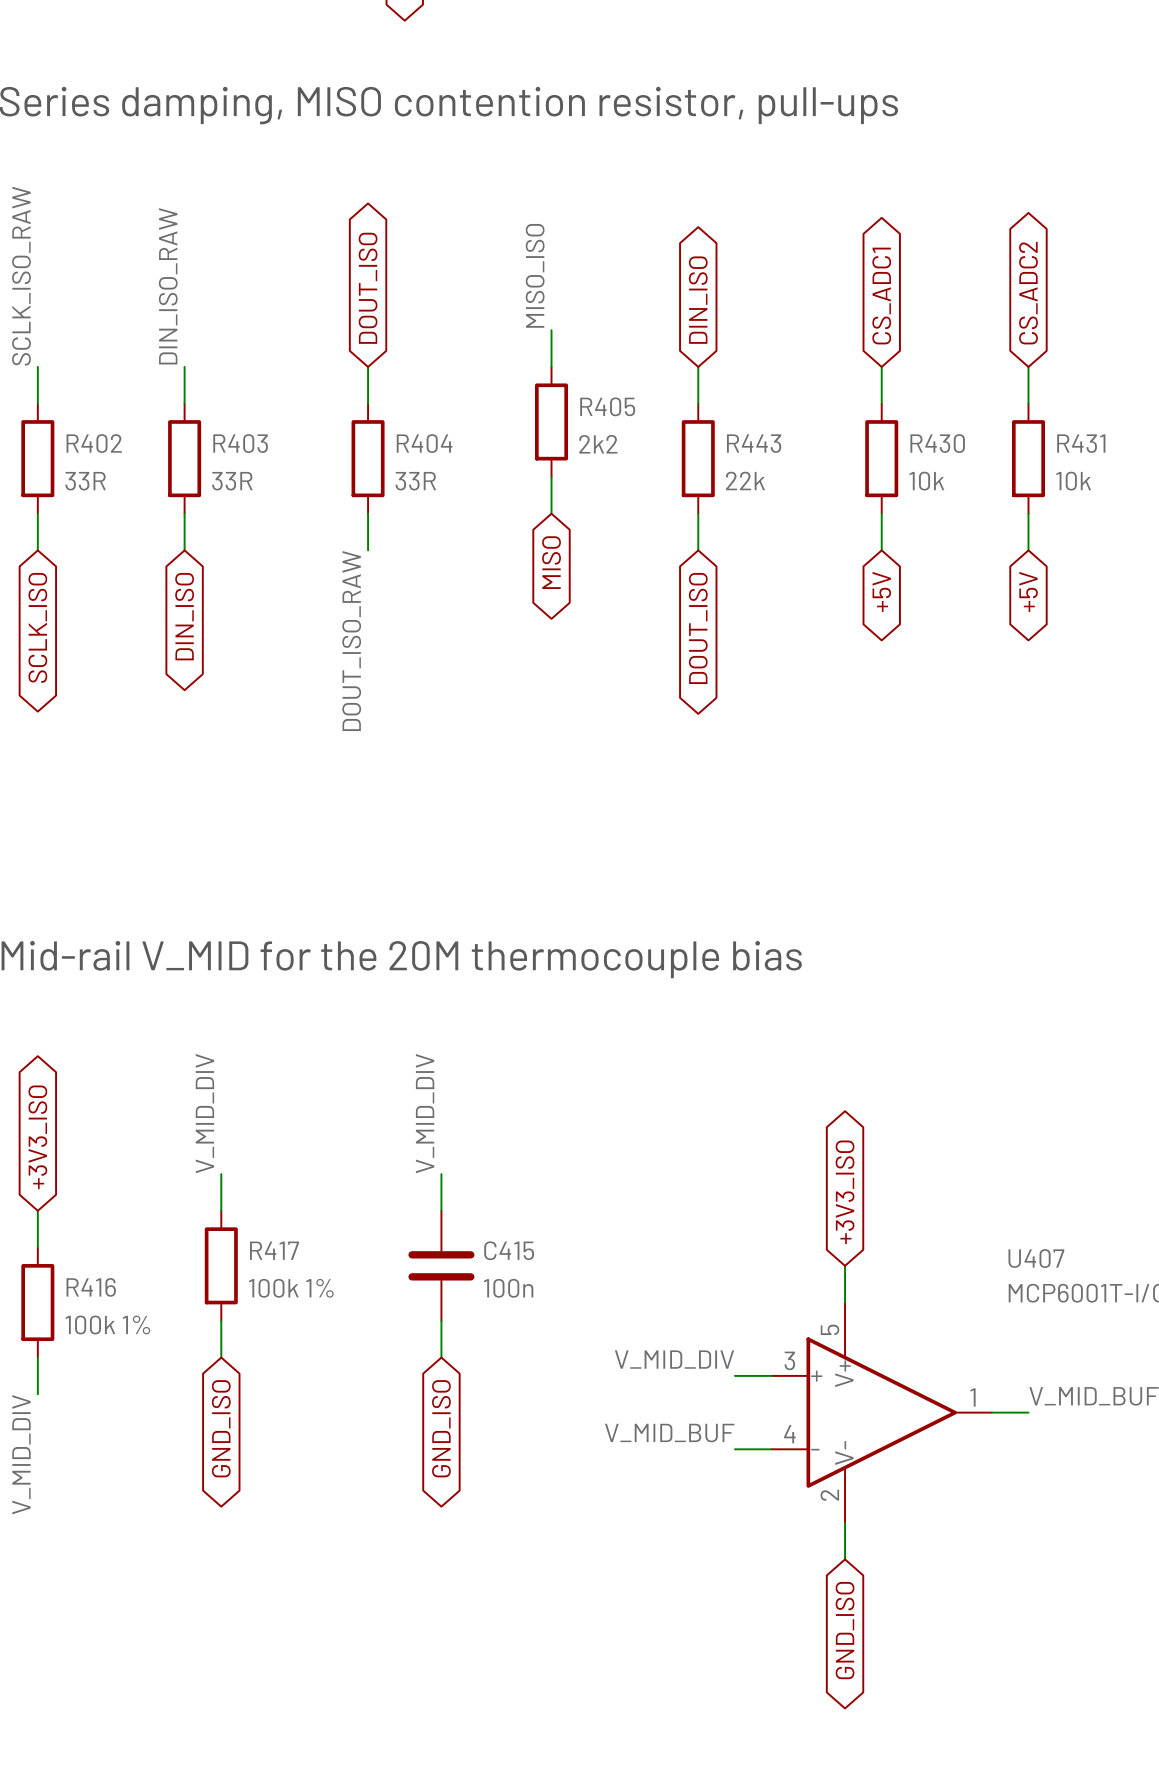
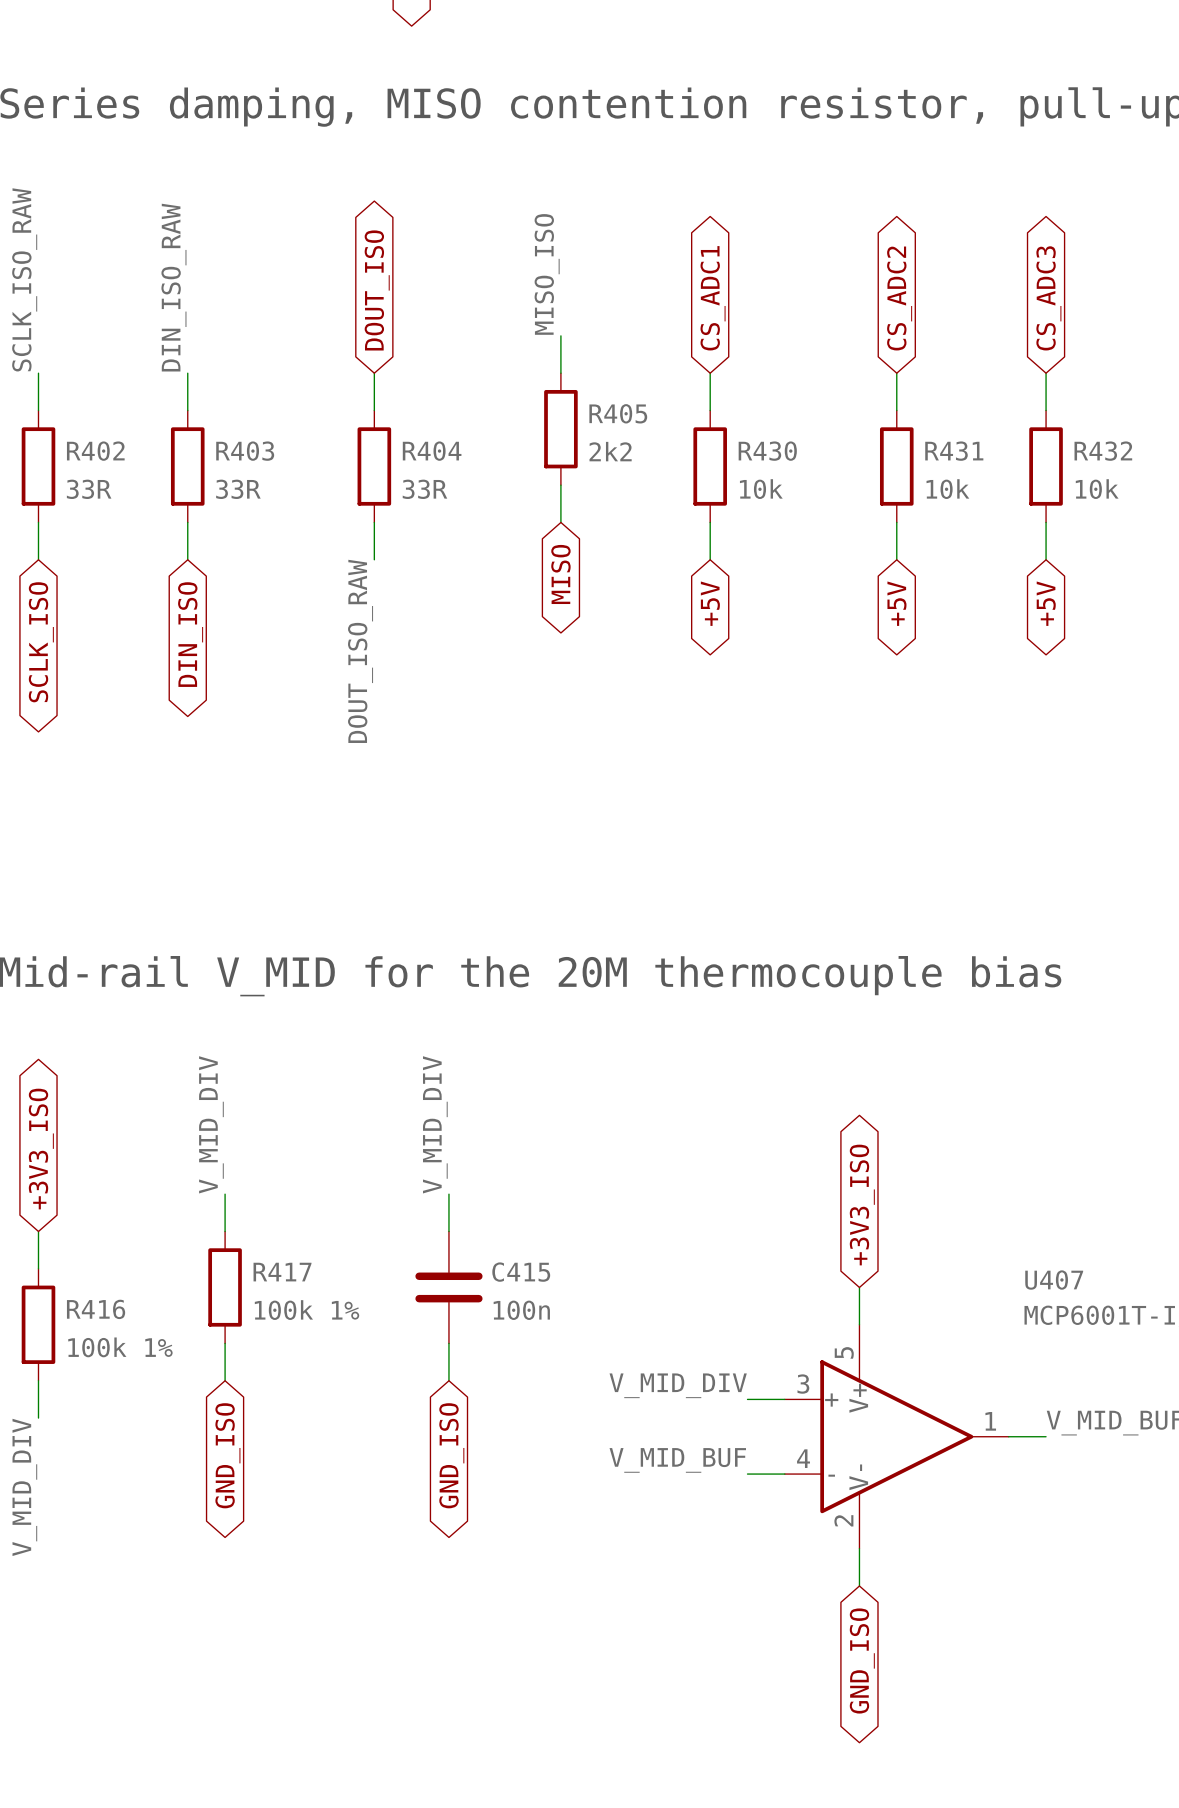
global label: CS_ADC2 (1028, 293) -> CS_ADC3 (1048, 298)
global label: CS_ADC1 (881, 296) -> CS_ADC2 (899, 298)
global label: DIN_ISO (698, 300) -> CS_ADC1 (713, 298)
R443 name: R443 (754, 443) -> R430 (767, 451)
R430 name: R430 (937, 443) -> R431 (954, 451)
R431 name: R431 (1081, 443) -> R432 (1103, 451)
R443 value: 22k (745, 480) -> 10k (761, 489)
global label: DOUT_ISO (698, 628) -> +5V (710, 603)

